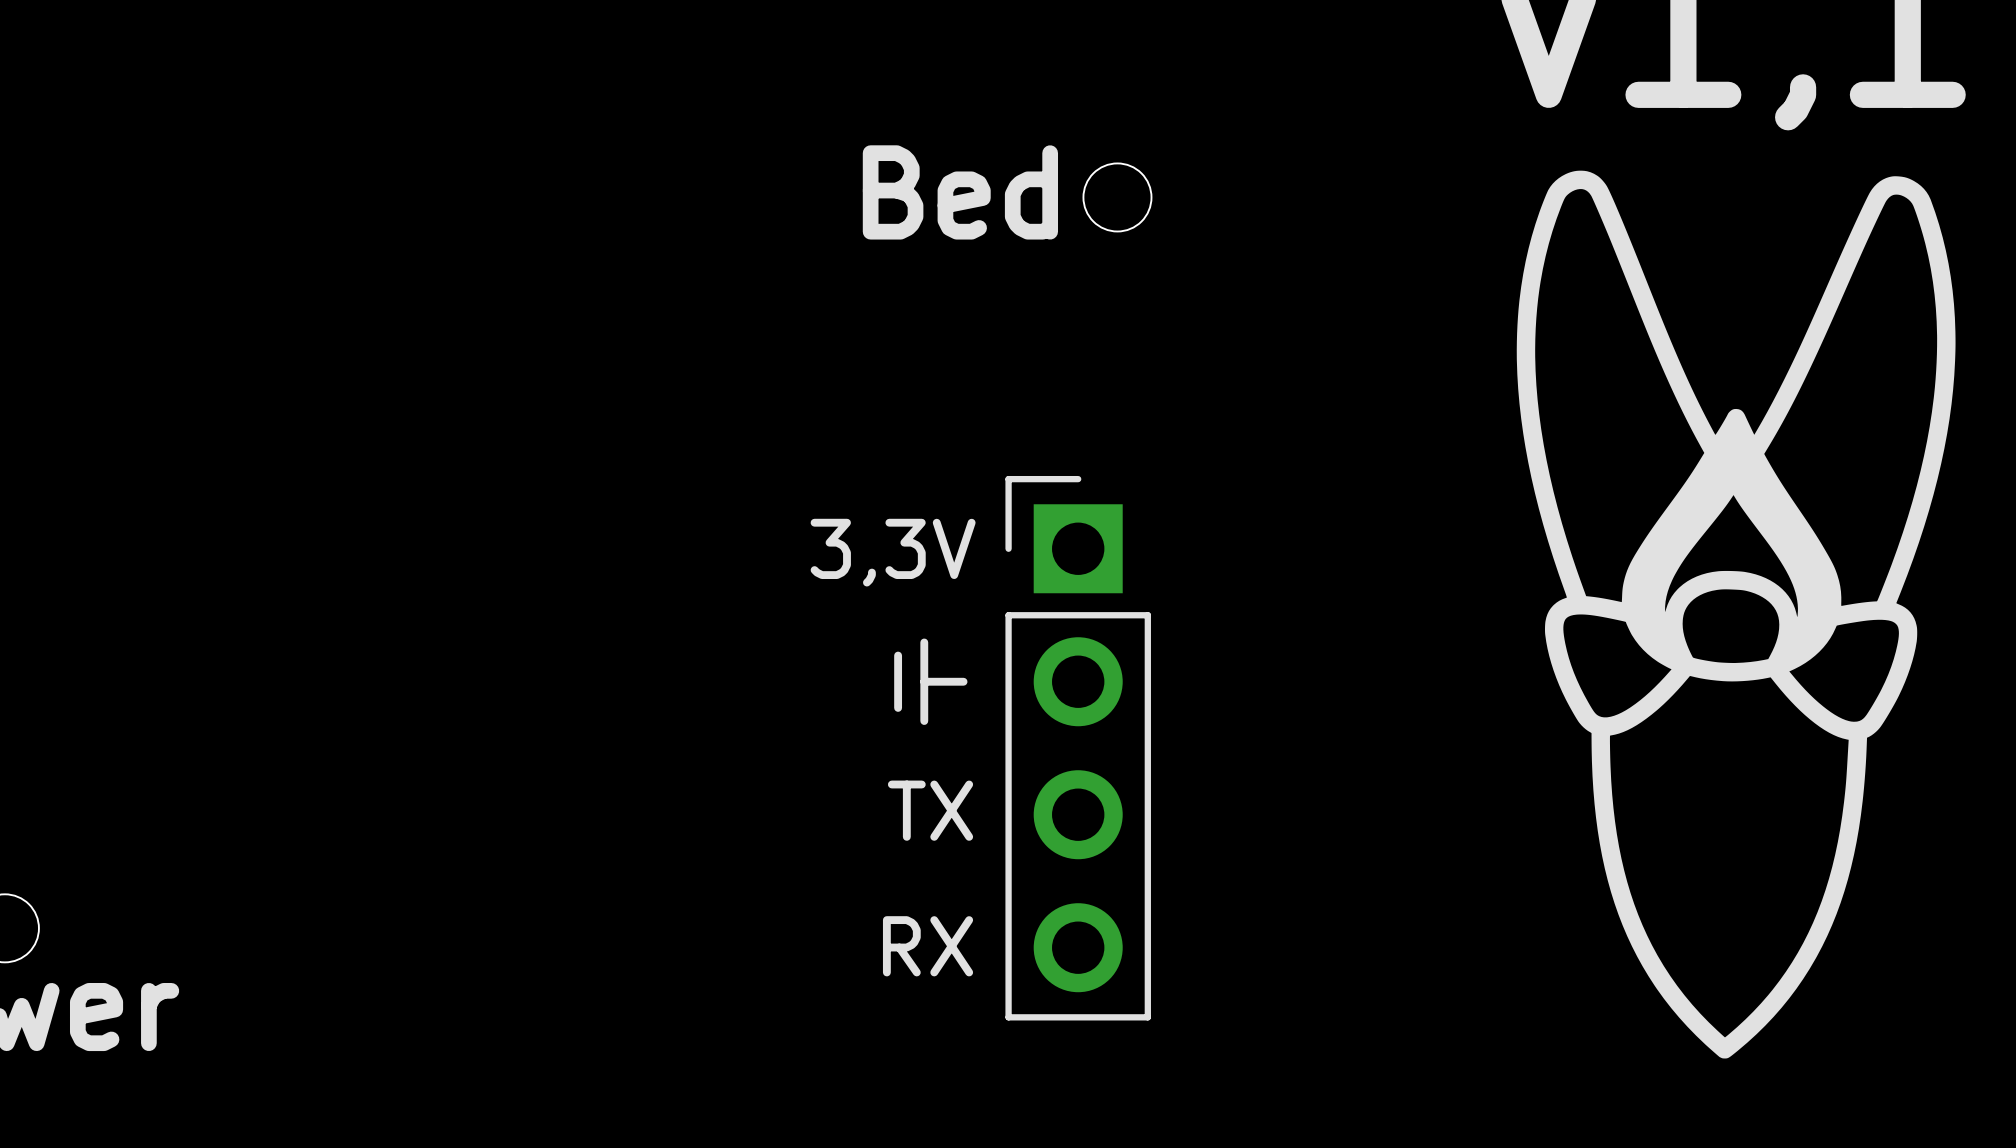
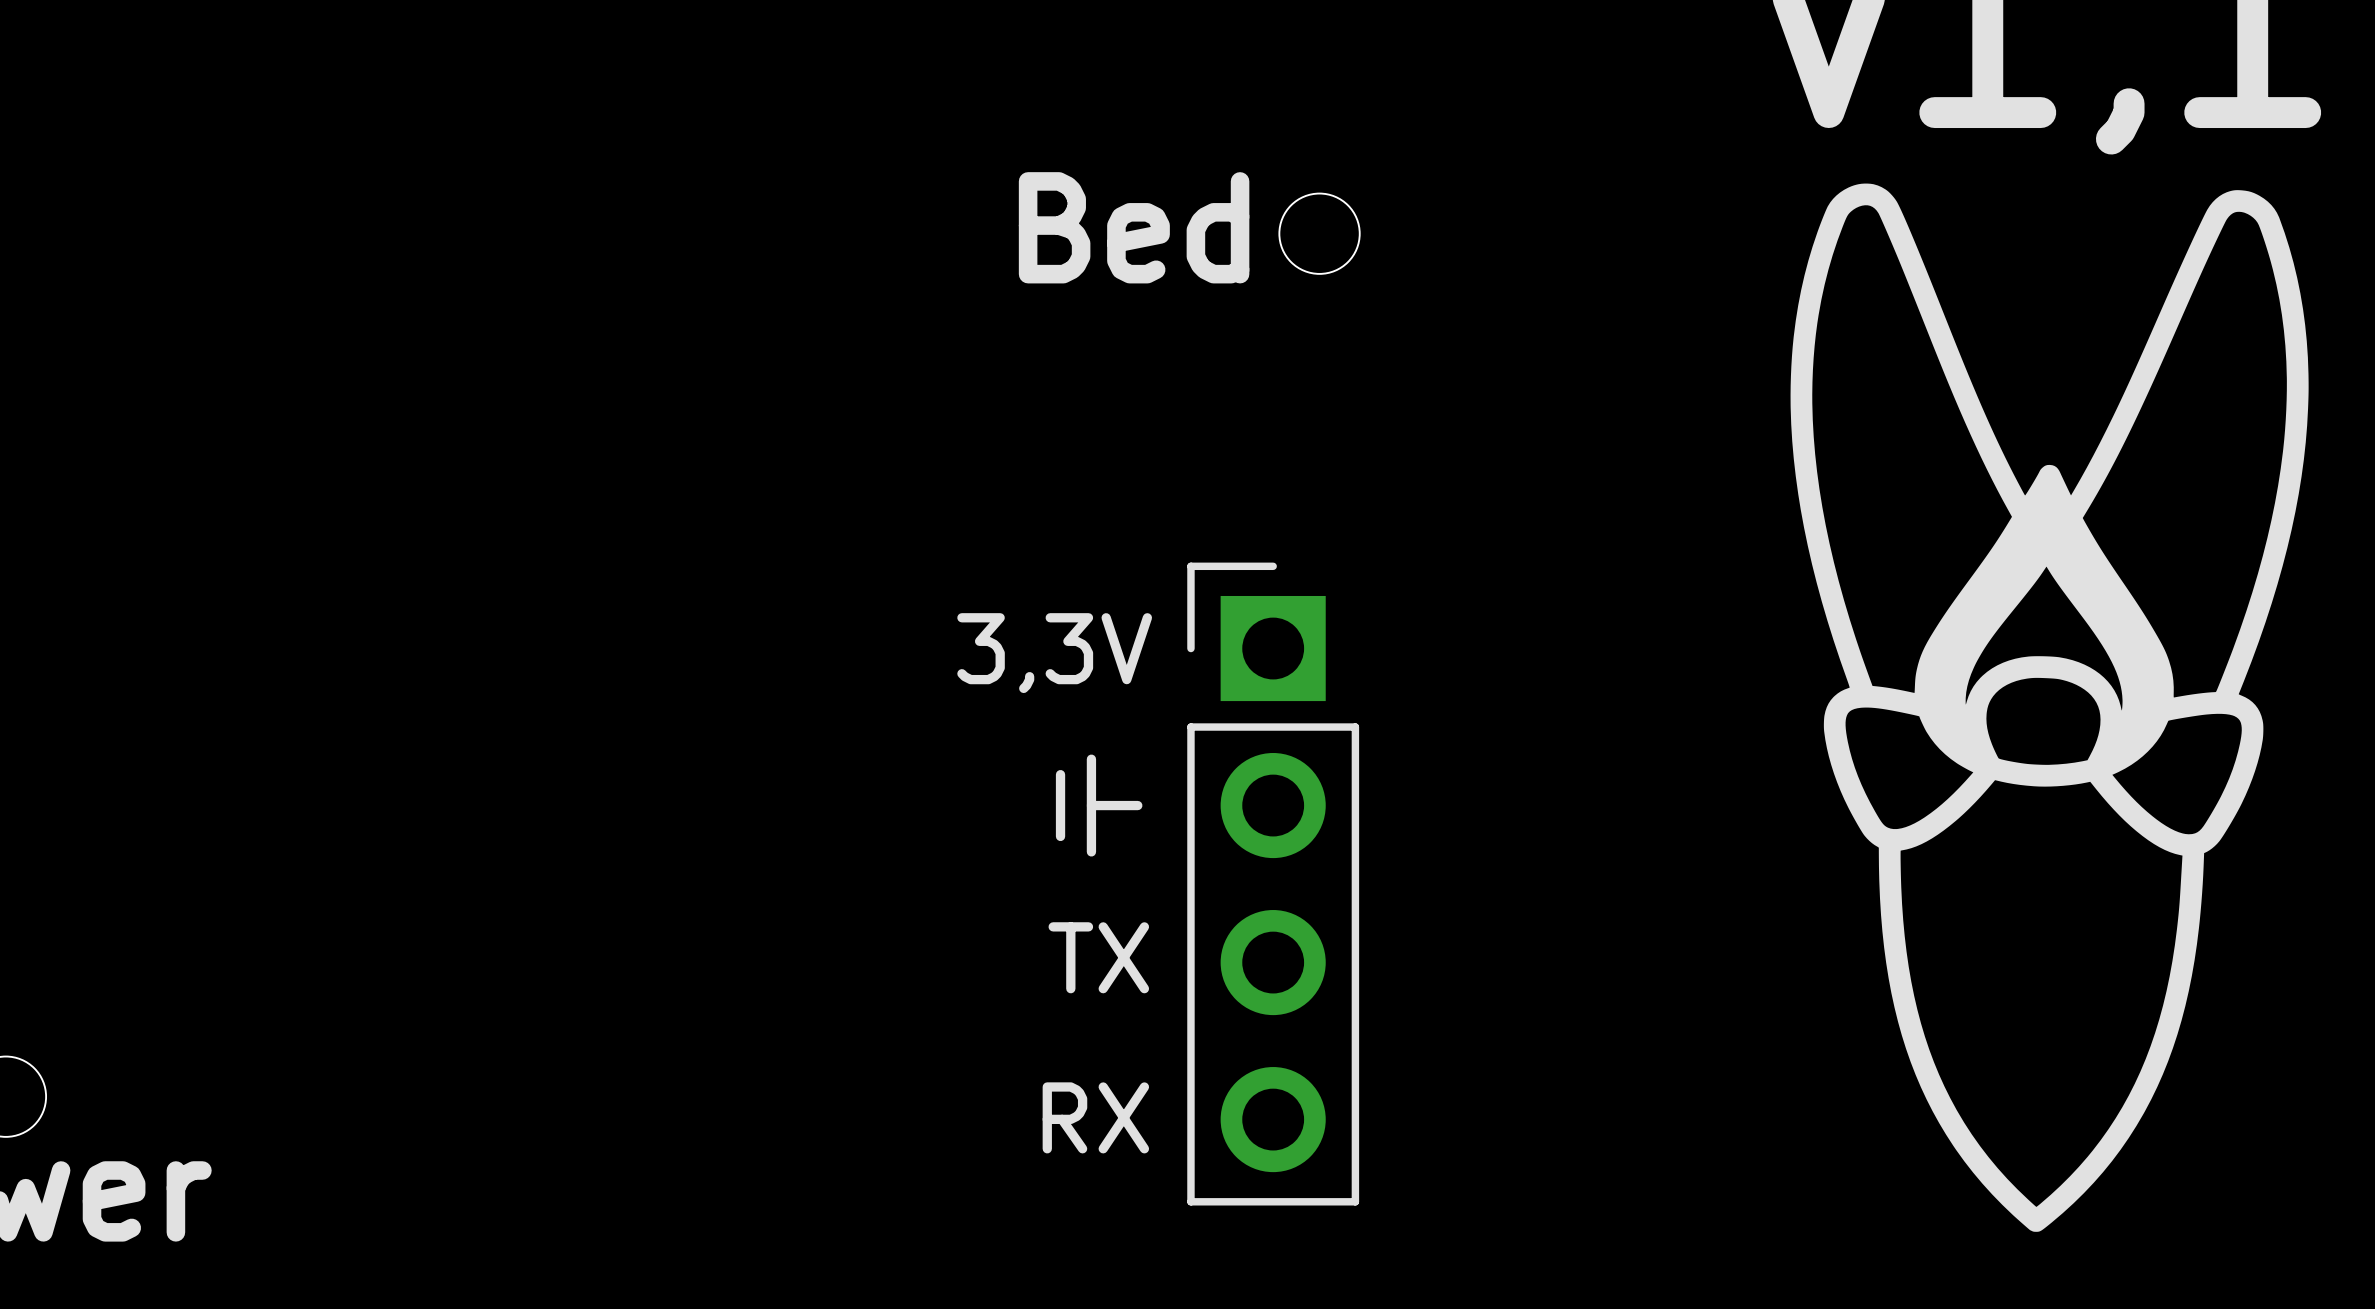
drawing position: (1736, 614) -> (2049, 707)

